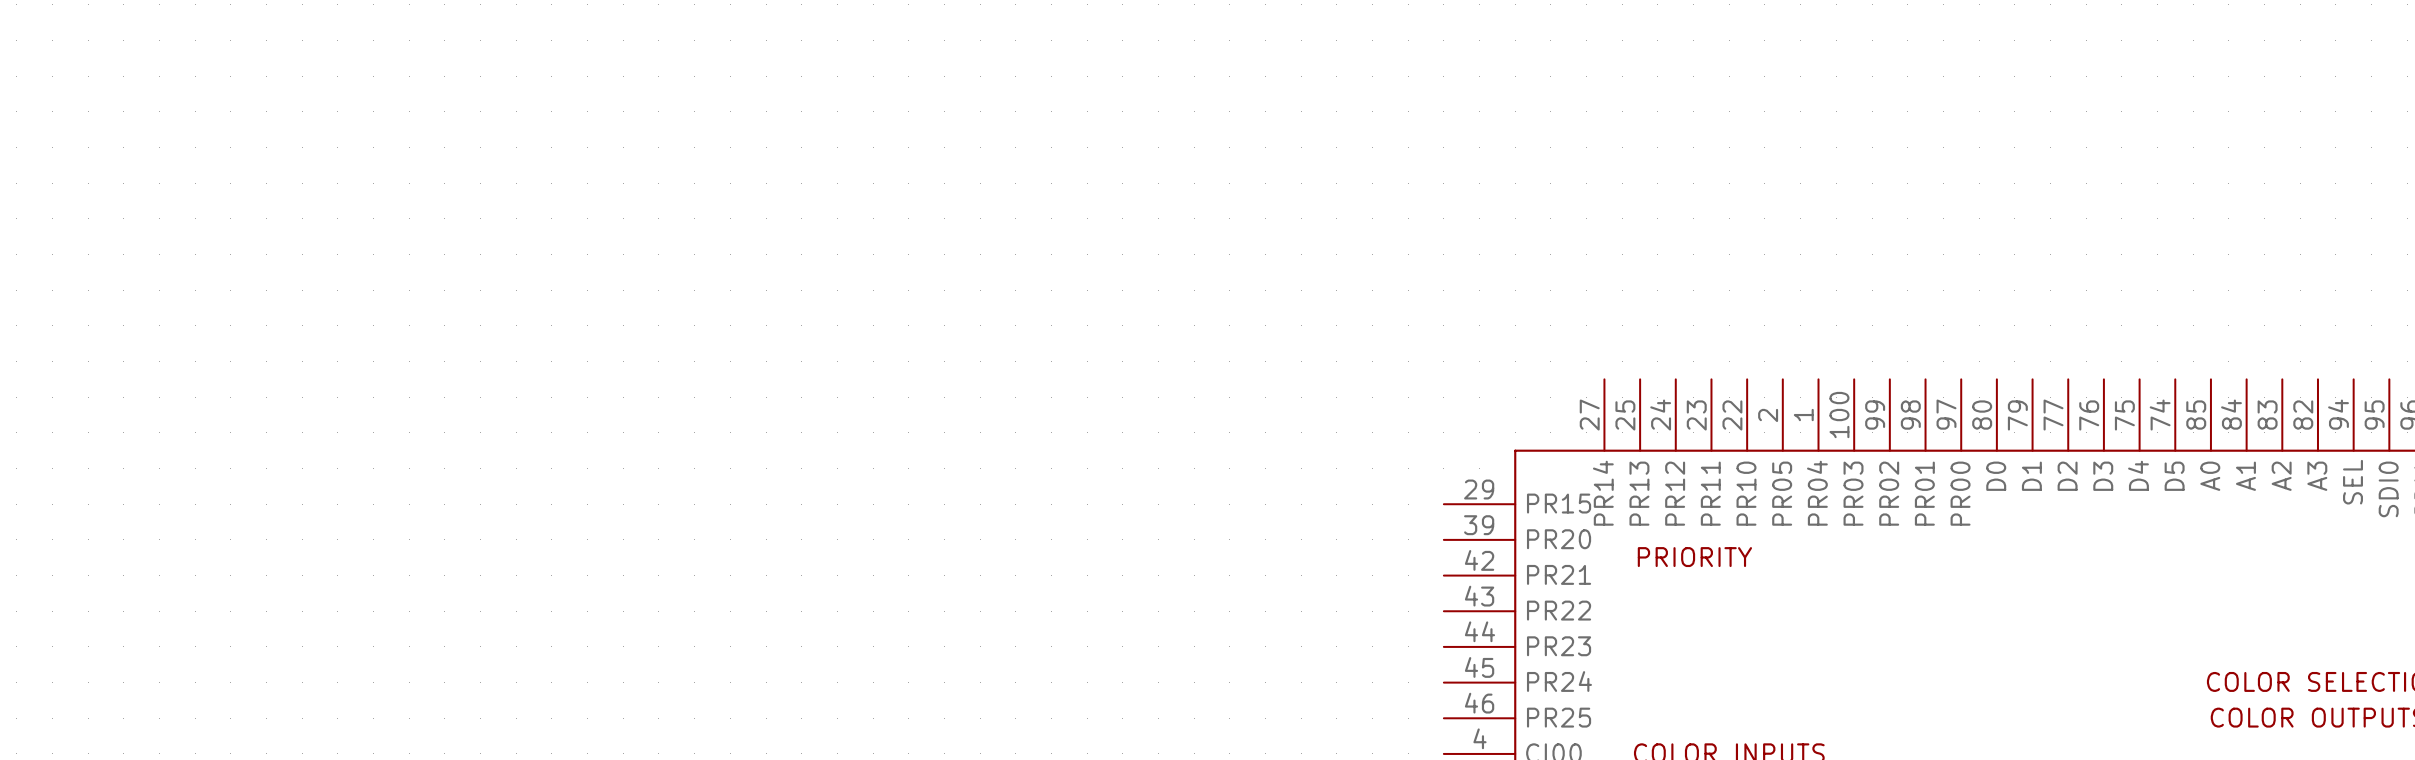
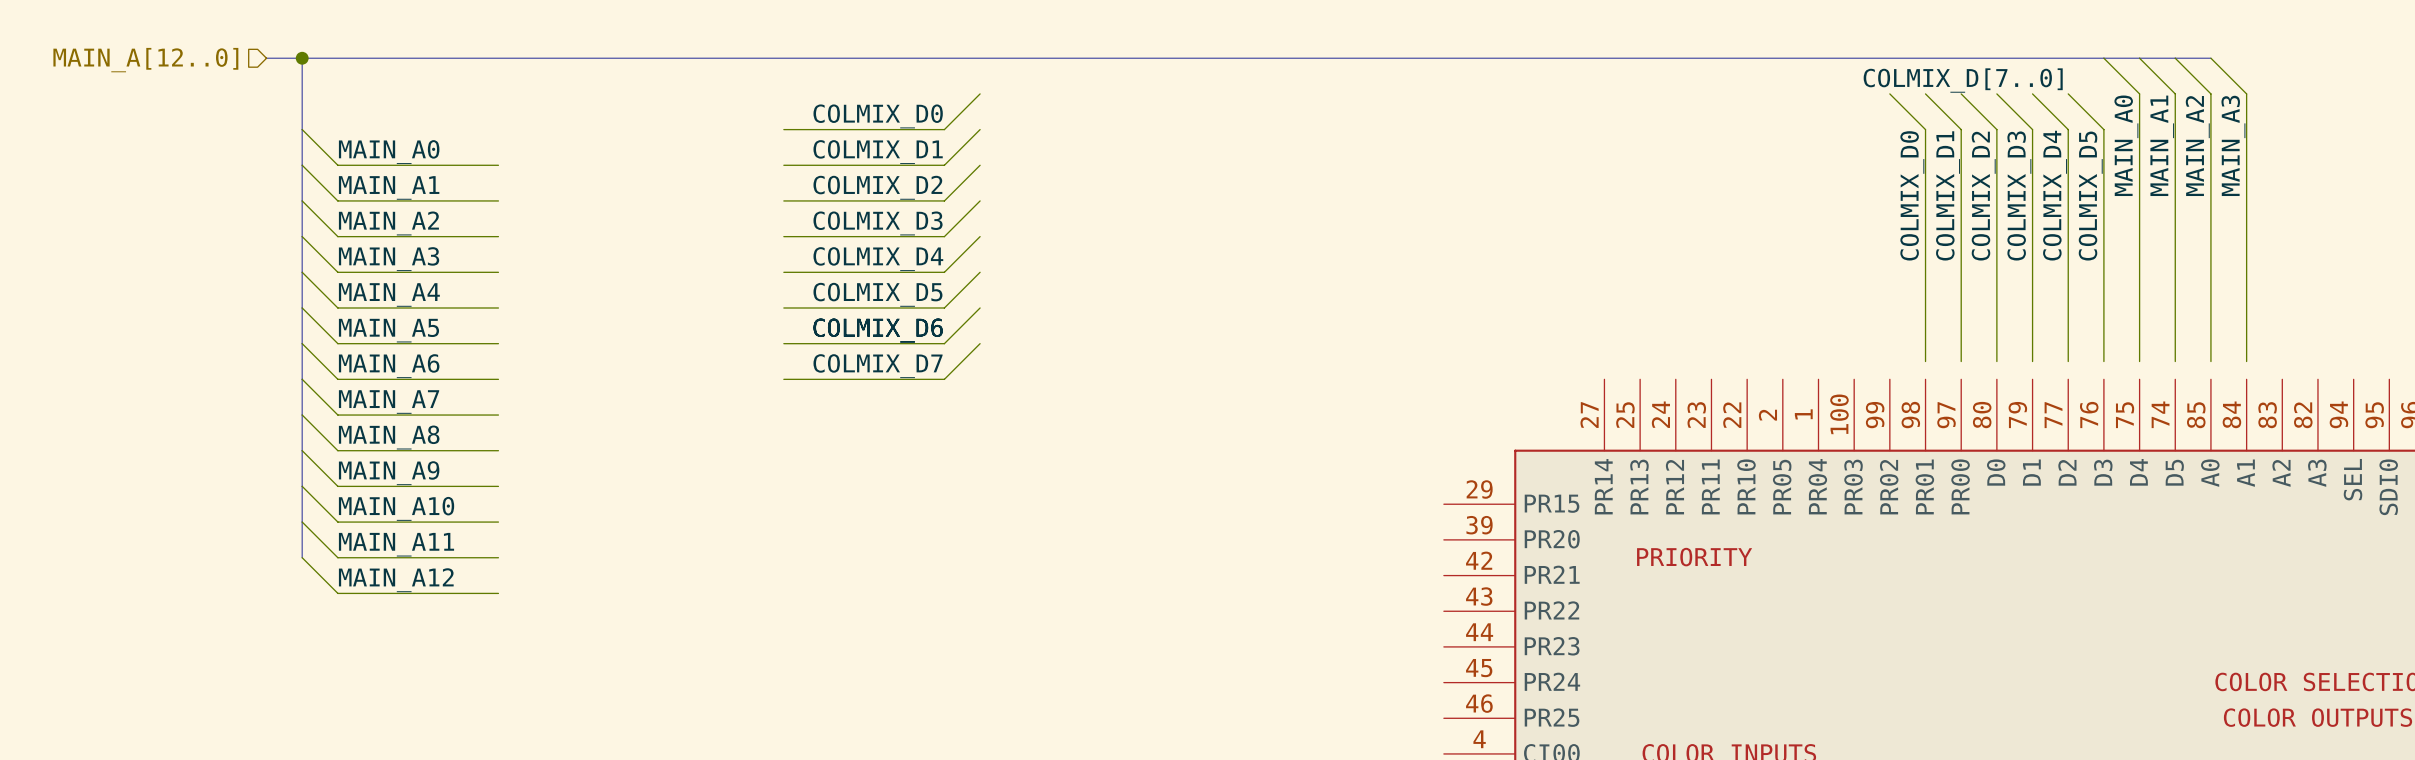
bus: none -> (266, 58) (2210, 58)
bus: none -> (302, 58) (302, 557)
junction: none -> (302, 58)
wire: none -> (2103, 58) (2139, 93) (2139, 361)
wire: none -> (2139, 58) (2175, 93) (2175, 361)
wire: none -> (2175, 58) (2210, 93) (2210, 361)
wire: none -> (2210, 58) (2246, 93) (2246, 361)
hierarchical label: none -> MAIN_A[12..0] (145, 60)
label: none -> COLMIX_D[7..0] (1963, 80)
wire: none -> (980, 93) (944, 129) (783, 129)
wire: none -> (1889, 93) (1925, 129) (1925, 361)
wire: none -> (1925, 93) (1961, 129) (1961, 361)
wire: none -> (1961, 93) (1996, 129) (1996, 361)
wire: none -> (1996, 93) (2032, 129) (2032, 361)
wire: none -> (2032, 93) (2068, 129) (2068, 361)
wire: none -> (2068, 93) (2103, 129) (2103, 361)
label: none -> COLMIX_D0 (878, 116)
wire: none -> (302, 129) (337, 165) (498, 165)
wire: none -> (980, 129) (944, 165) (783, 165)
label: none -> MAIN_A0 (2126, 145)
label: none -> MAIN_A1 (2162, 145)
label: none -> MAIN_A2 (2197, 146)
label: none -> MAIN_A3 (2233, 145)
label: none -> MAIN_A0 (389, 152)
label: none -> COLMIX_D1 (878, 152)
wire: none -> (302, 165) (337, 200) (498, 200)
wire: none -> (980, 165) (944, 200) (783, 200)
label: none -> MAIN_A1 (389, 187)
label: none -> COLMIX_D2 (877, 187)
wire: none -> (302, 200) (337, 236) (498, 236)
wire: none -> (980, 200) (944, 236) (783, 236)
label: none -> COLMIX_D0 (1912, 195)
label: none -> COLMIX_D1 (1948, 195)
label: none -> COLMIX_D2 (1983, 196)
label: none -> COLMIX_D3 (2019, 195)
label: none -> COLMIX_D4 (2055, 195)
label: none -> COLMIX_D5 (2090, 196)
label: none -> MAIN_A2 (388, 223)
label: none -> COLMIX_D3 (878, 223)
wire: none -> (302, 236) (337, 272) (498, 272)
wire: none -> (980, 236) (944, 272) (783, 272)
label: none -> COLMIX_D4 (878, 259)
label: none -> MAIN_A3 (389, 259)
wire: none -> (302, 272) (337, 307) (498, 307)
wire: none -> (980, 272) (944, 307) (783, 307)
label: none -> MAIN_A4 (389, 294)
label: none -> COLMIX_D5 (877, 294)
wire: none -> (302, 307) (337, 343) (498, 343)
wire: none -> (980, 307) (944, 343) (783, 343)
label: none -> MAIN_A5 (388, 330)
label: none -> COLMIX_D6 (878, 330)
wire: none -> (302, 343) (337, 379) (498, 379)
wire: none -> (980, 343) (944, 379) (783, 379)
label: none -> MAIN_A6 (389, 366)
label: none -> COLMIX_D7 (878, 366)
wire: none -> (302, 379) (337, 415) (498, 415)
label: none -> MAIN_A7 (389, 401)
wire: none -> (302, 415) (337, 450) (498, 450)
label: none -> MAIN_A8 (389, 437)
wire: none -> (302, 450) (337, 486) (498, 486)
label: none -> MAIN_A9 (389, 473)
wire: none -> (302, 486) (337, 522) (498, 522)
label: none -> MAIN_A10 (396, 508)
wire: none -> (302, 522) (337, 557) (498, 557)
label: none -> MAIN_A11 (396, 544)
wire: none -> (302, 557) (337, 593) (498, 593)
label: none -> MAIN_A12 (396, 580)

